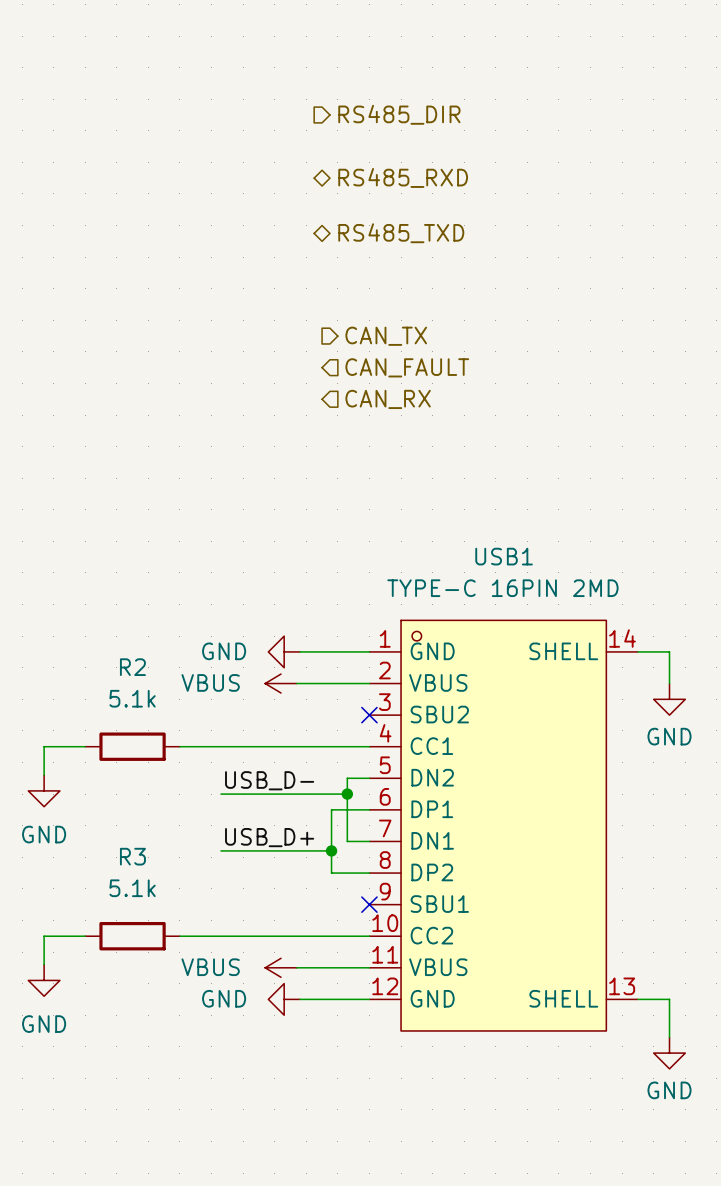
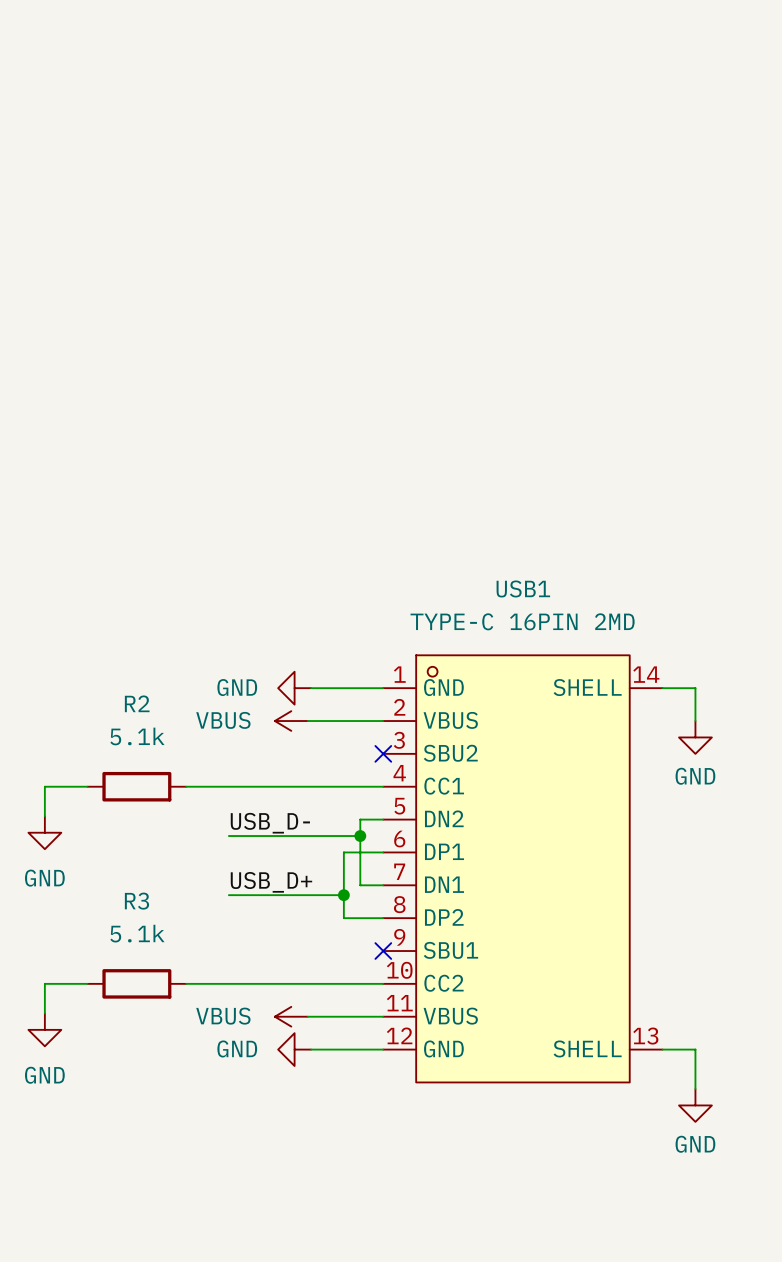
hierarchical label: RS485_DIR (399, 114) -> none
hierarchical label: RS485_RXD (403, 177) -> none
hierarchical label: RS485_TXD (401, 233) -> none
hierarchical label: CAN_TX (386, 336) -> none
hierarchical label: CAN_FAULT (407, 367) -> none
hierarchical label: CAN_RX (388, 399) -> none

